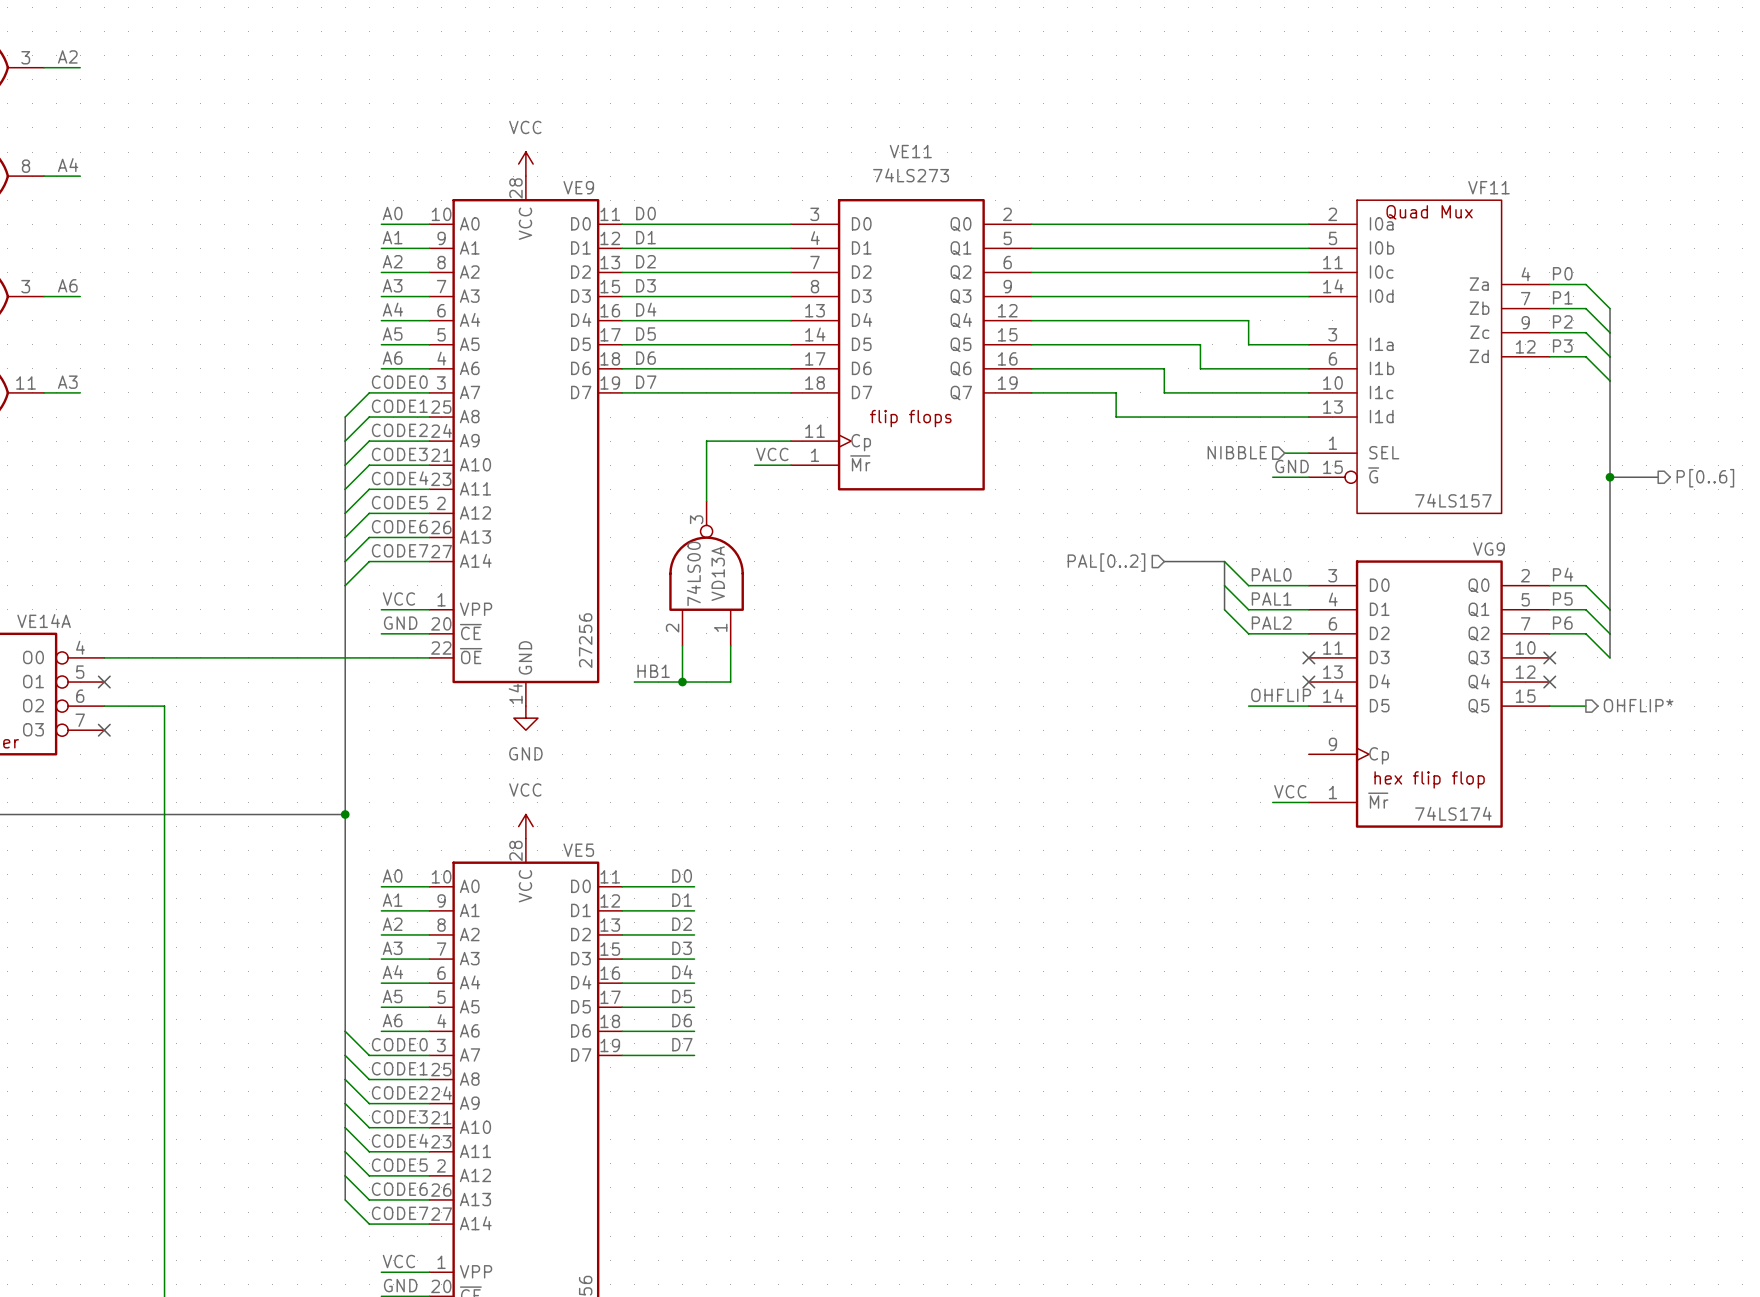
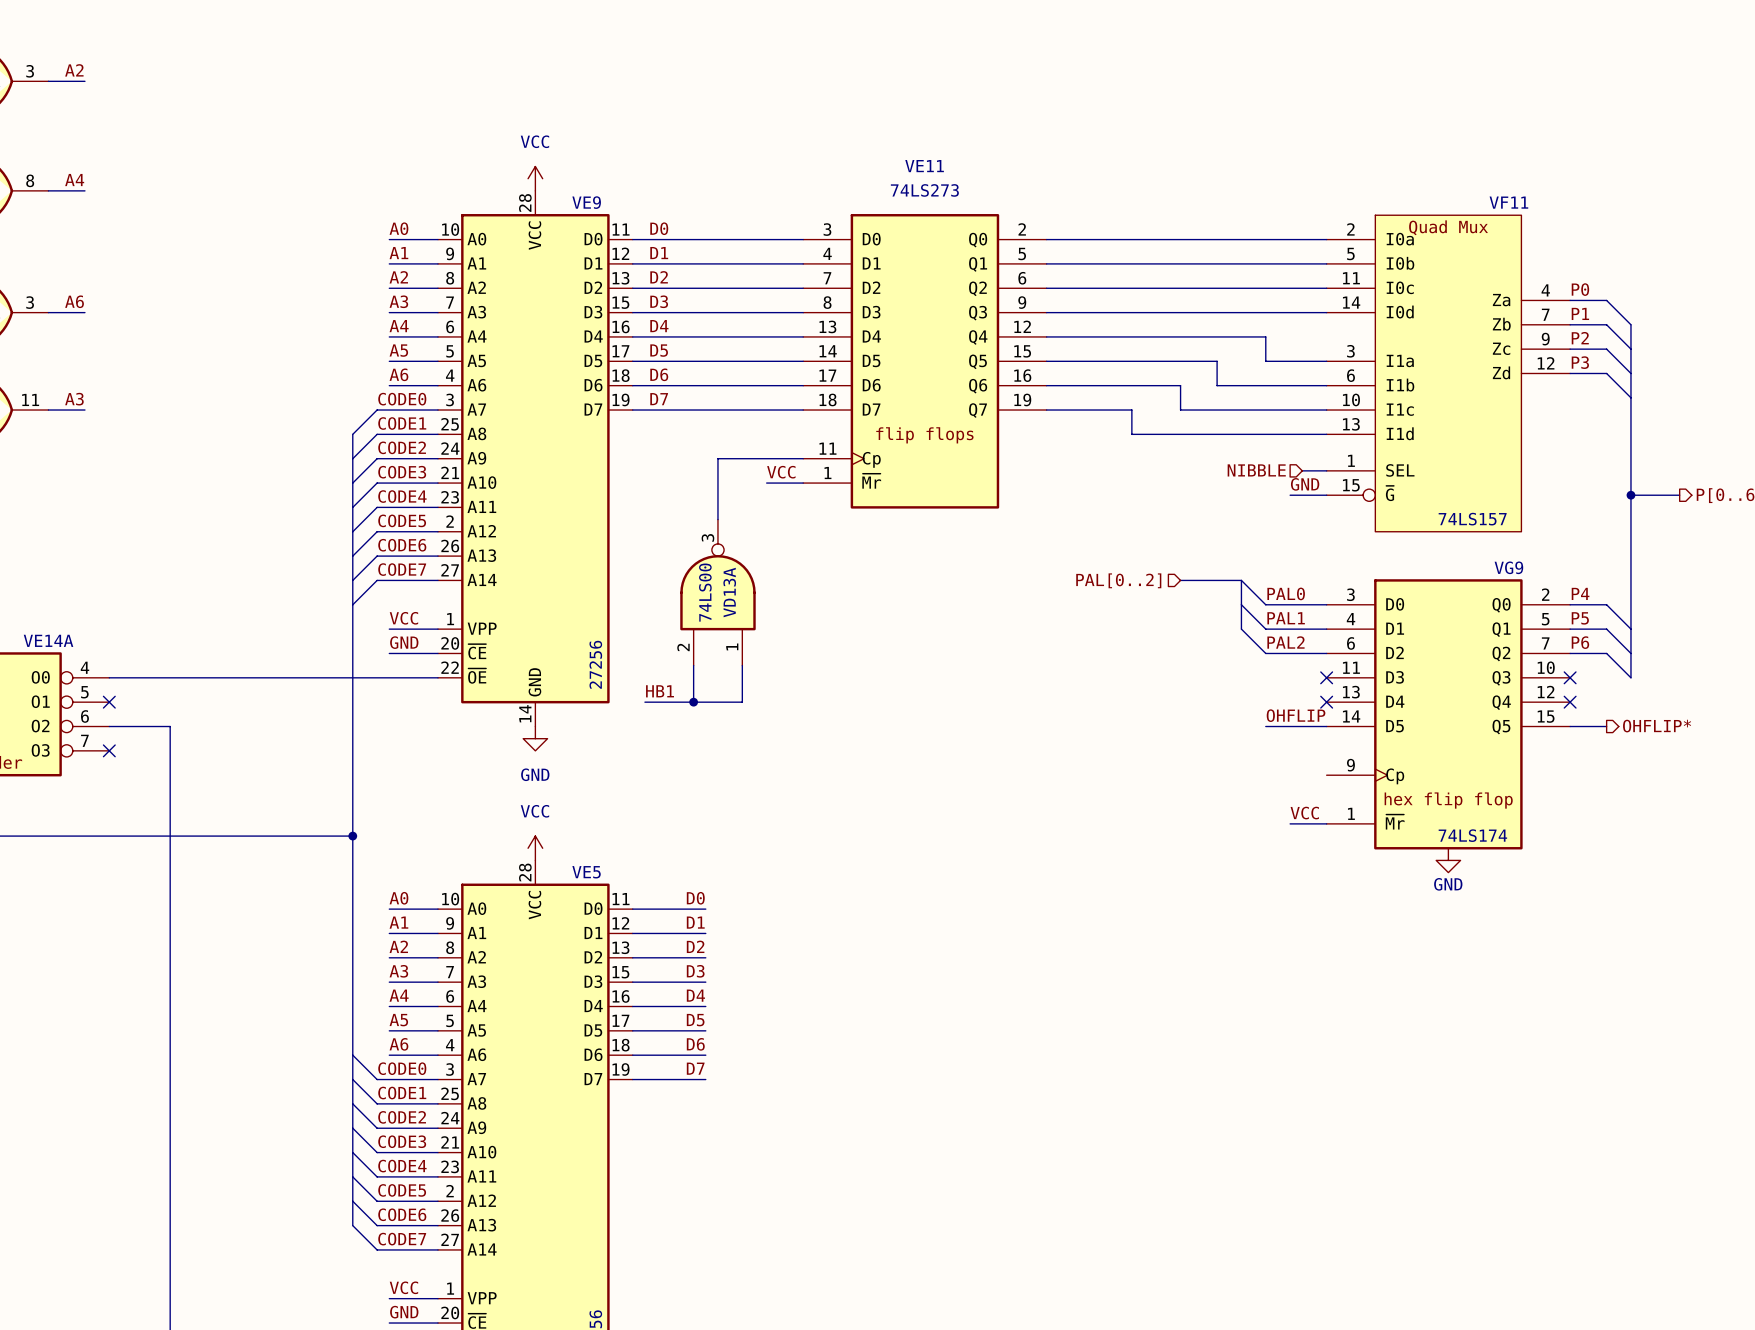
power symbol: none -> GND (1448, 860)

